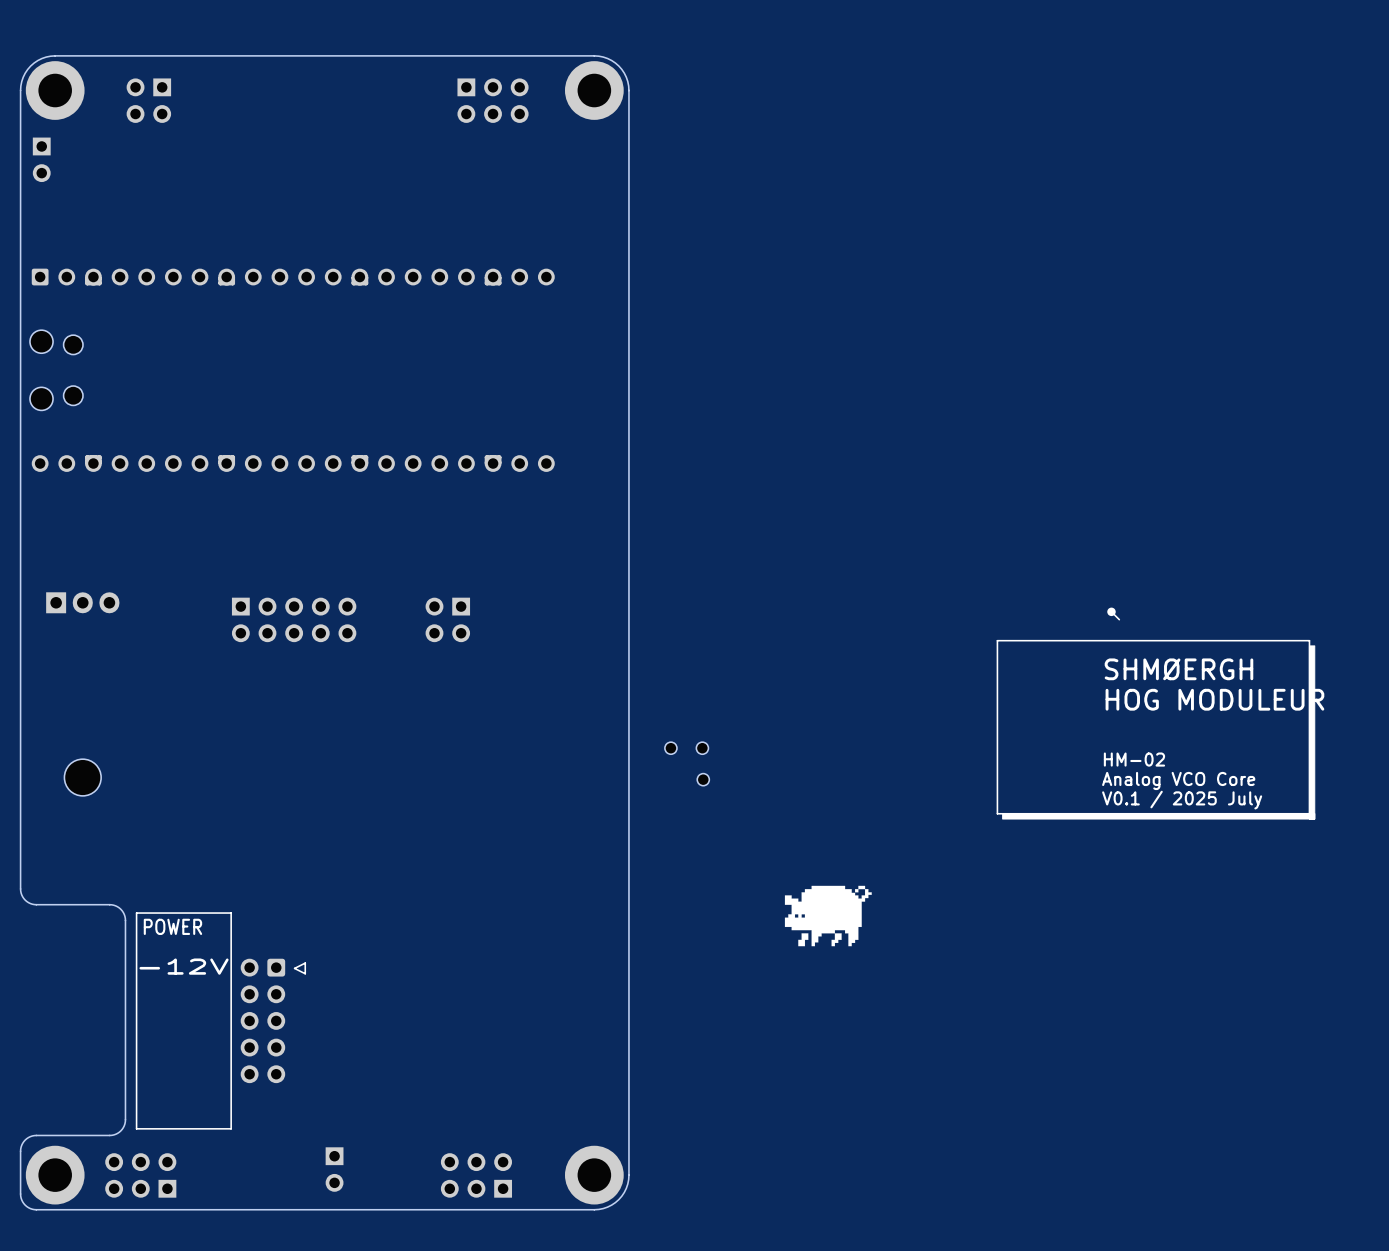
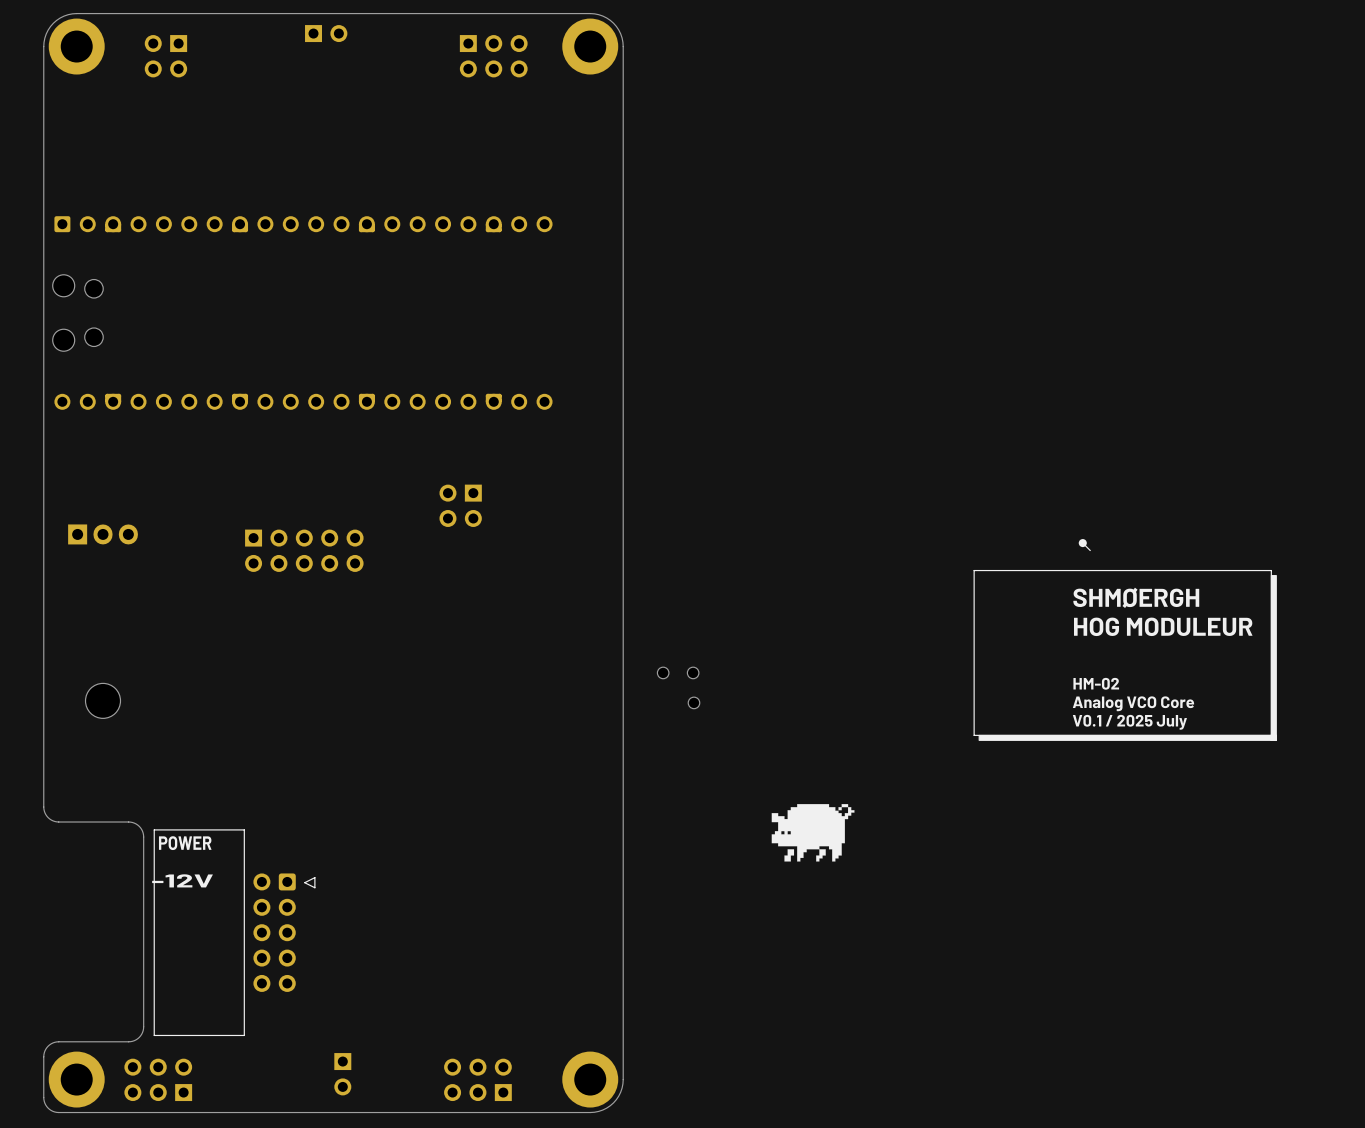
part: none -> (326, 33)
part: (41, 159) -> none
part position: (447, 619) -> (460, 505)

